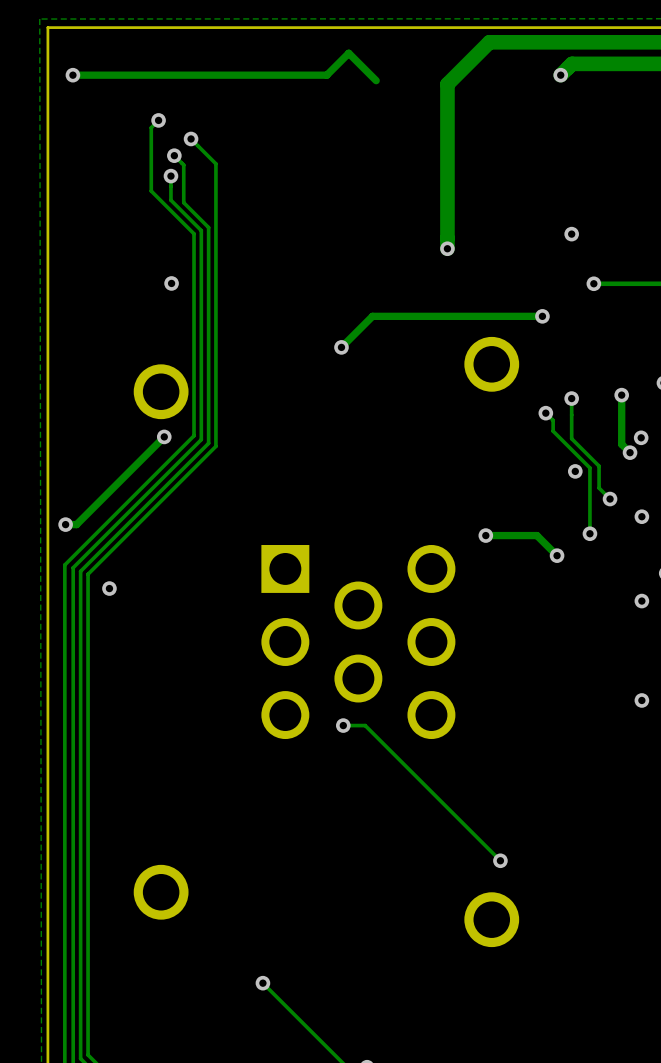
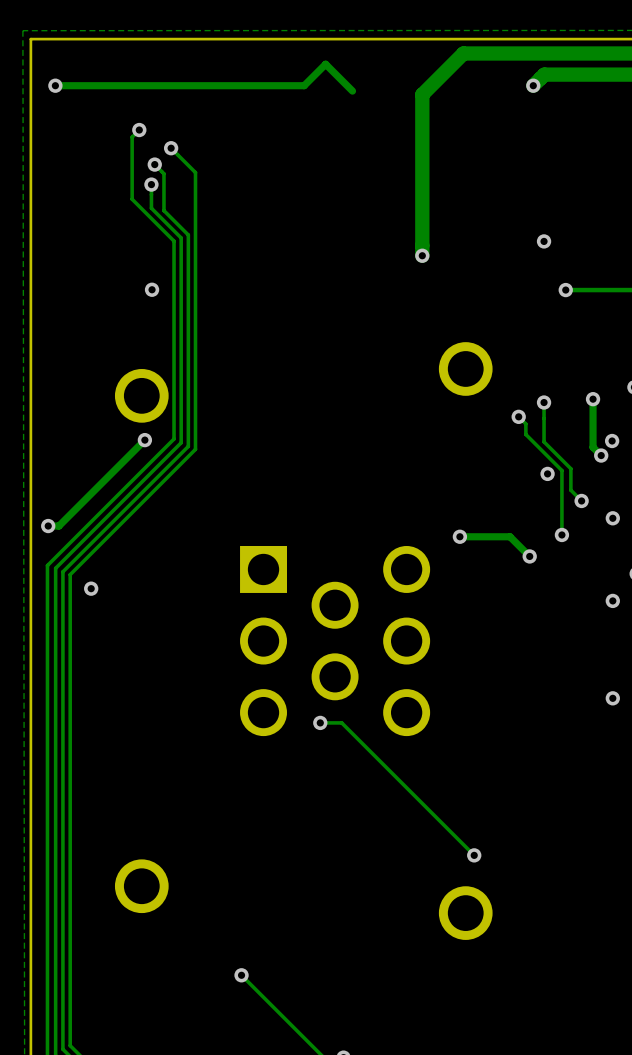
track: (542, 316) (372, 316) (341, 347) -> none
via: (542, 316) -> none
via: (341, 347) -> none

